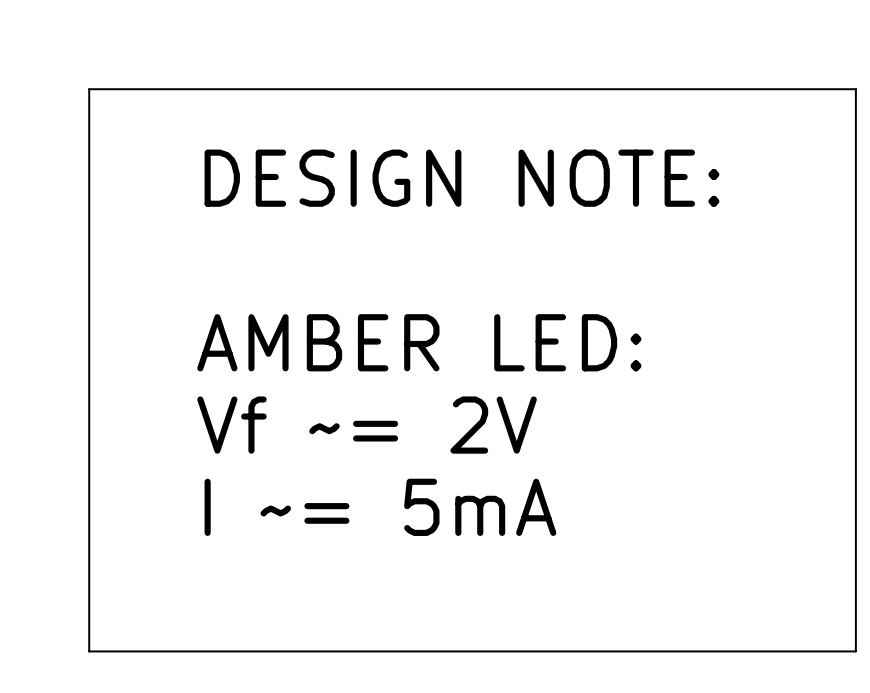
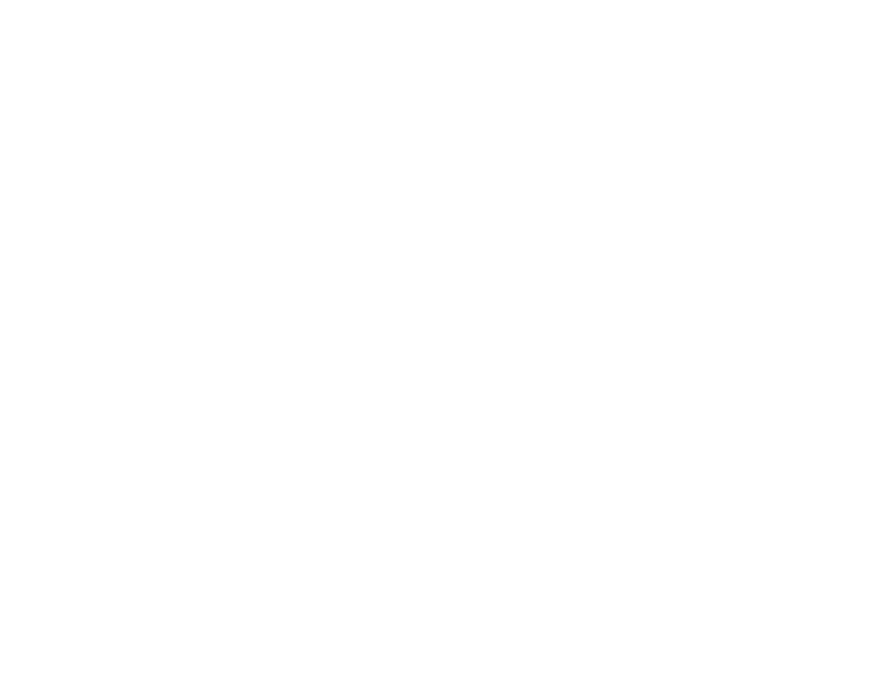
line: (89, 89) (855, 89) (855, 651) (89, 651) (89, 89) -> none
text: DESIGN NOTE: (461, 178) -> none
text: AMBER LED: (419, 342) -> none
text: Vf ~= 2V (367, 425) -> none
text: I ~= 5mA (380, 507) -> none

